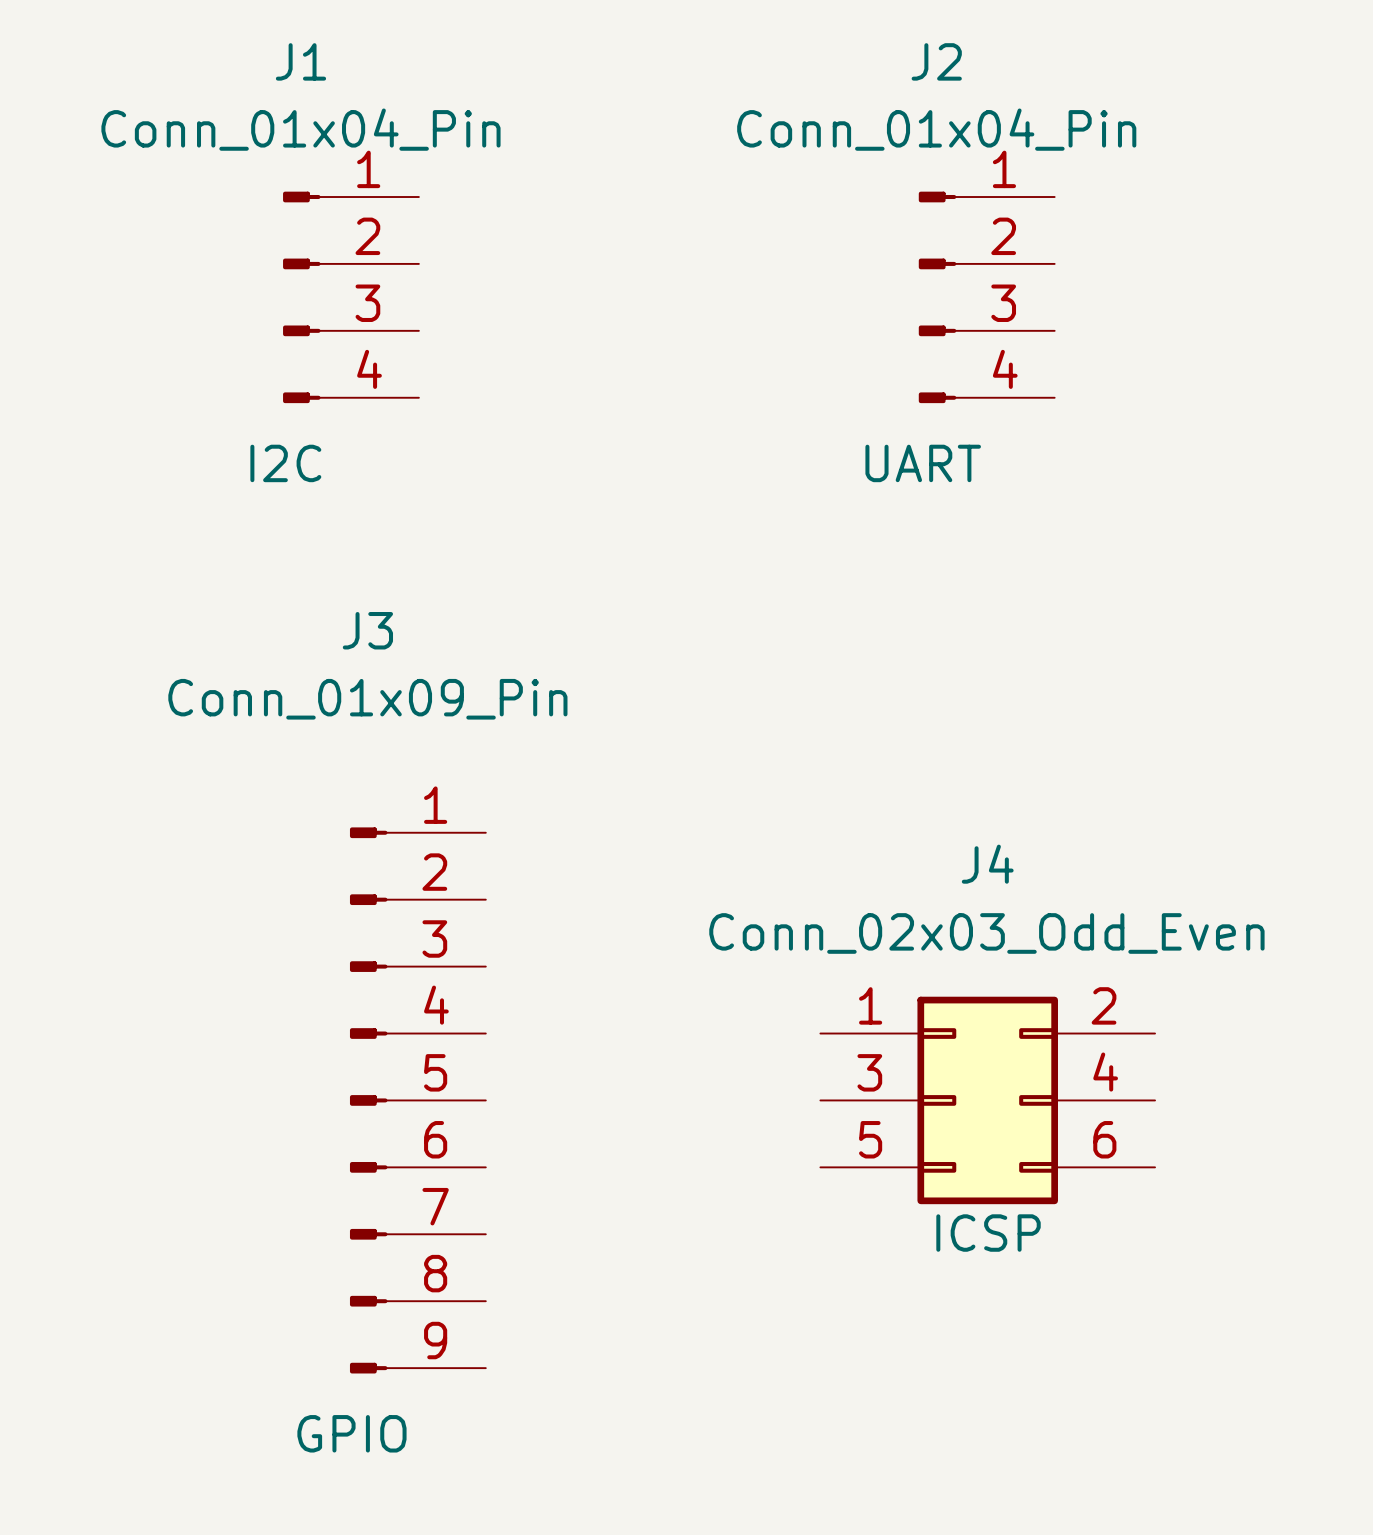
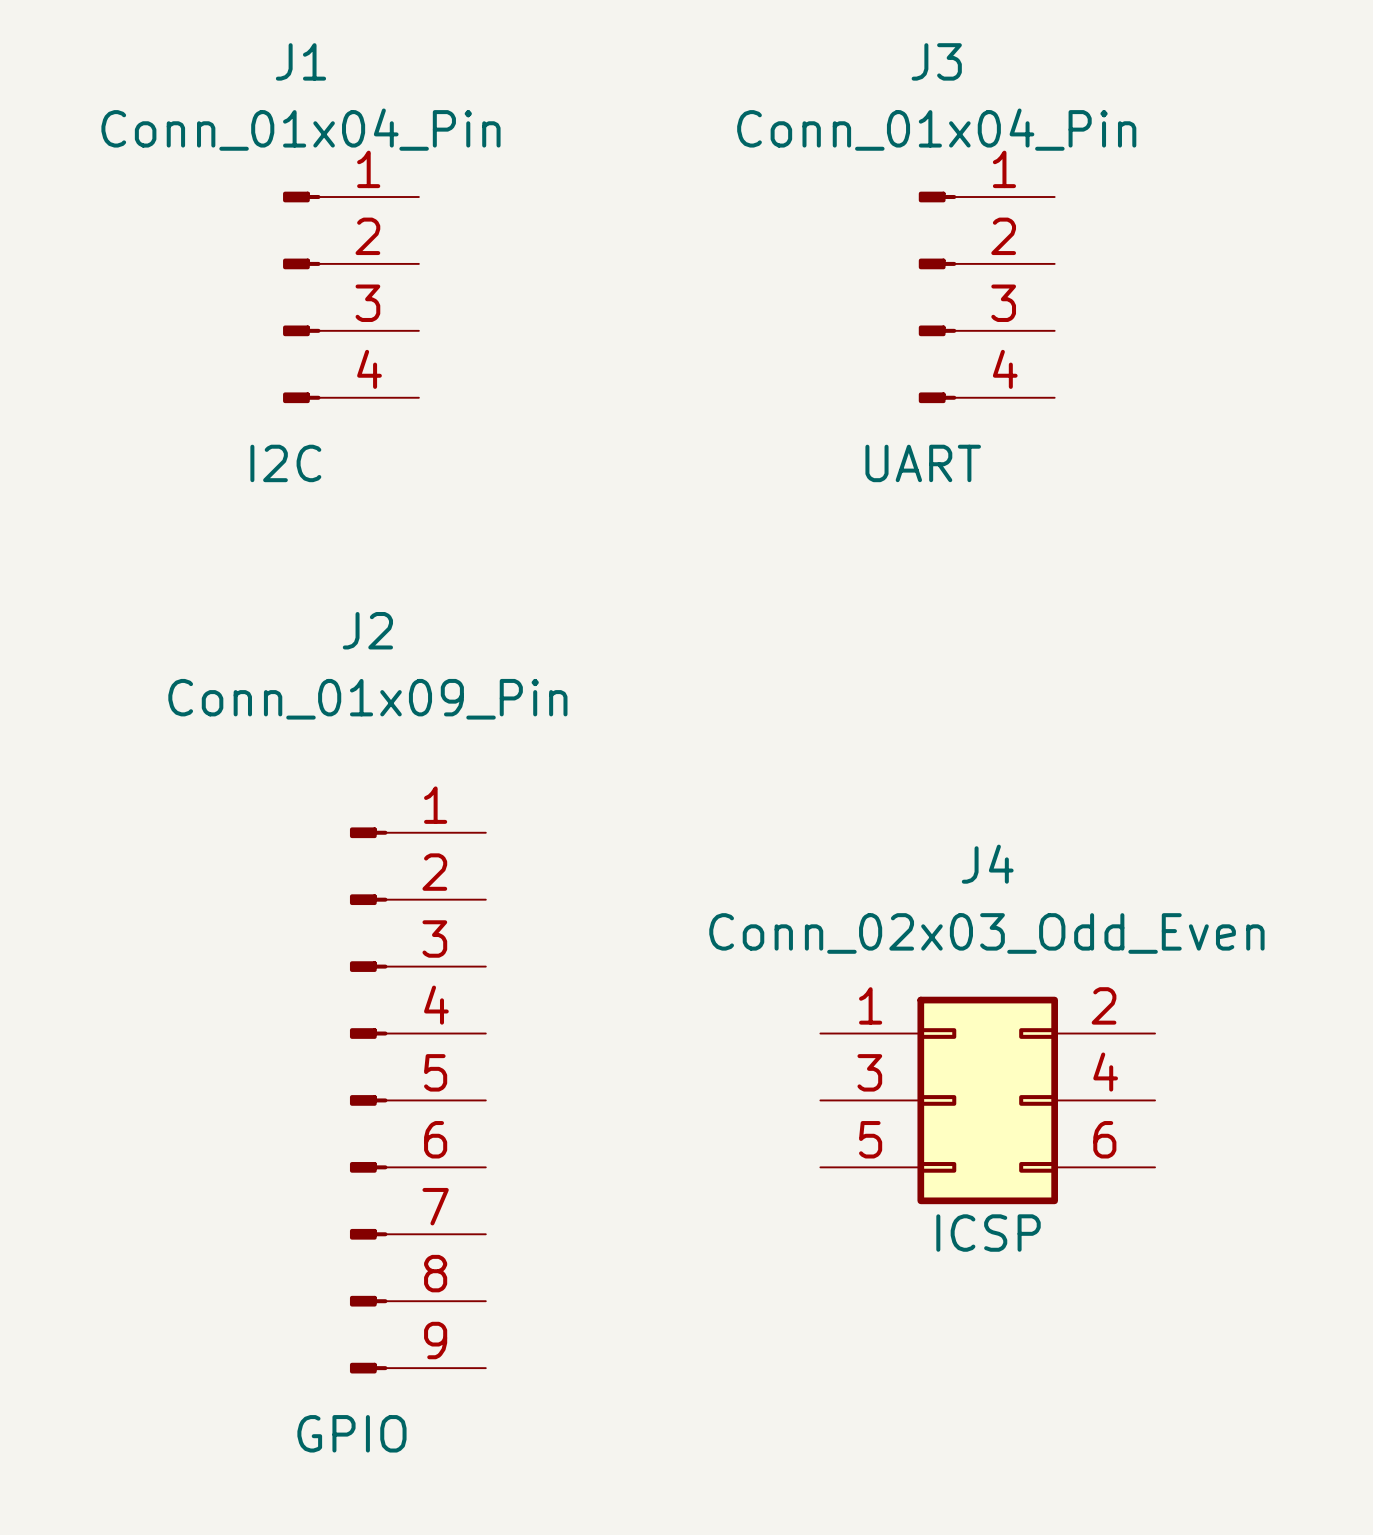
J2 name: J2 (936, 61) -> J3 (936, 61)
J3 name: J3 (367, 630) -> J2 (367, 630)

